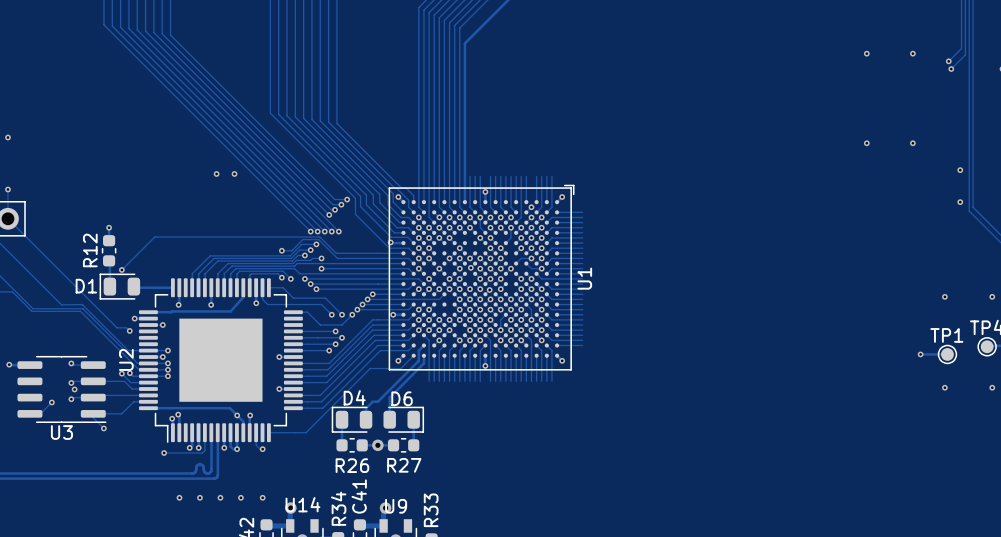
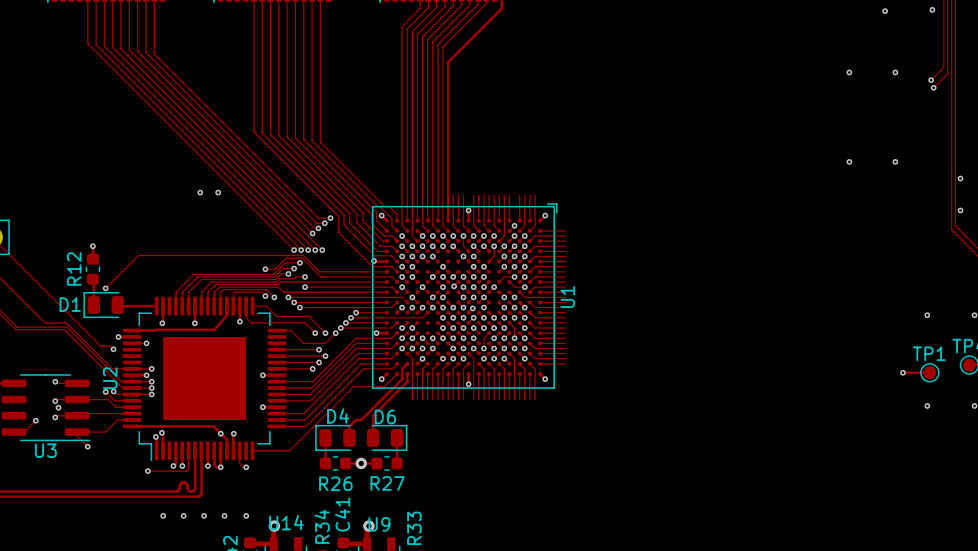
via: none -> (960, 178)
via: (960, 170) -> none
via: none -> (960, 210)
via: (960, 202) -> none

